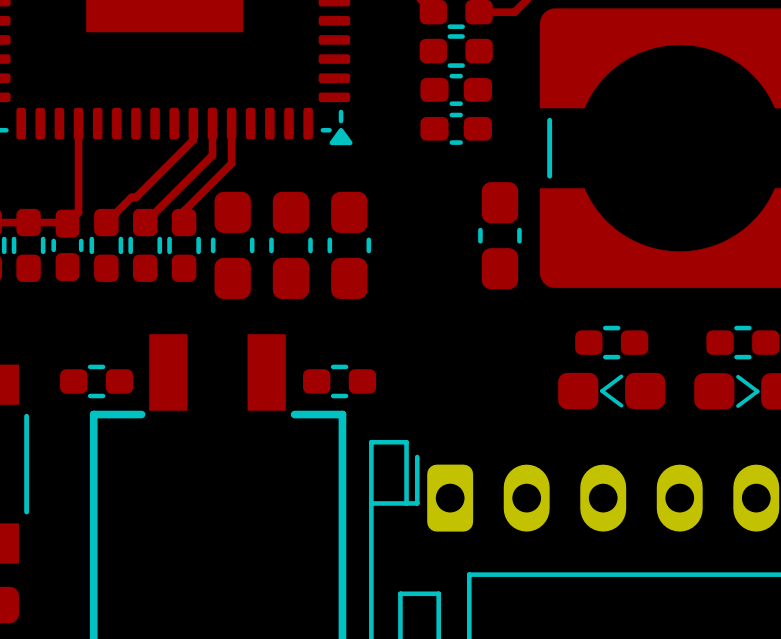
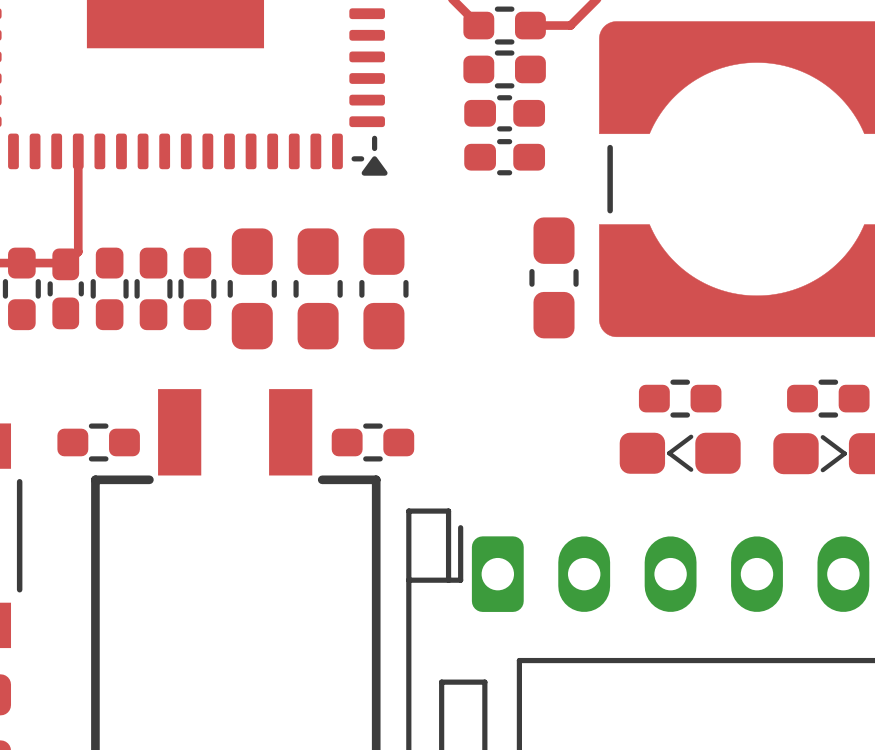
top track: (193, 123) (193, 140) (136, 197) (131, 197) (106, 222) -> none
top track: (212, 123) (212, 155) (145, 222) -> none
top track: (231, 123) (231, 163) (184, 211) (184, 222) -> none

